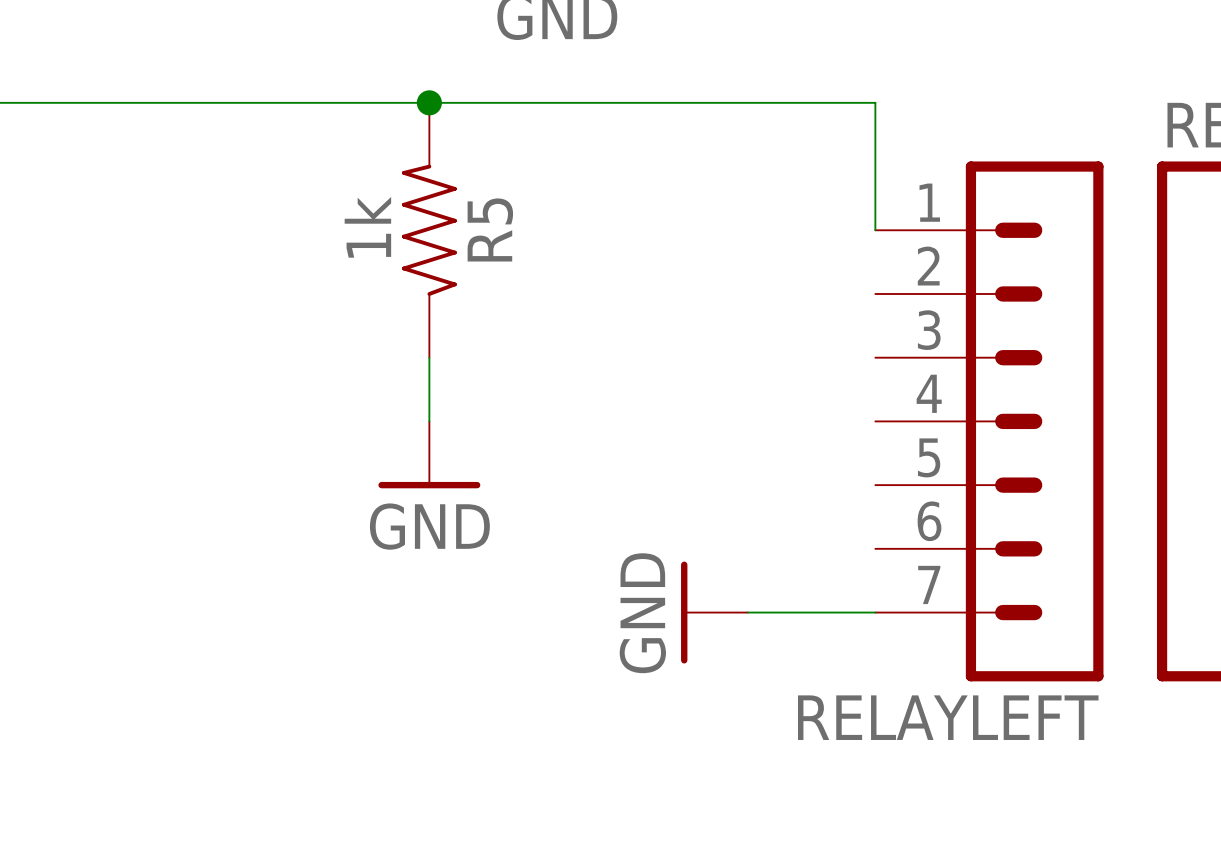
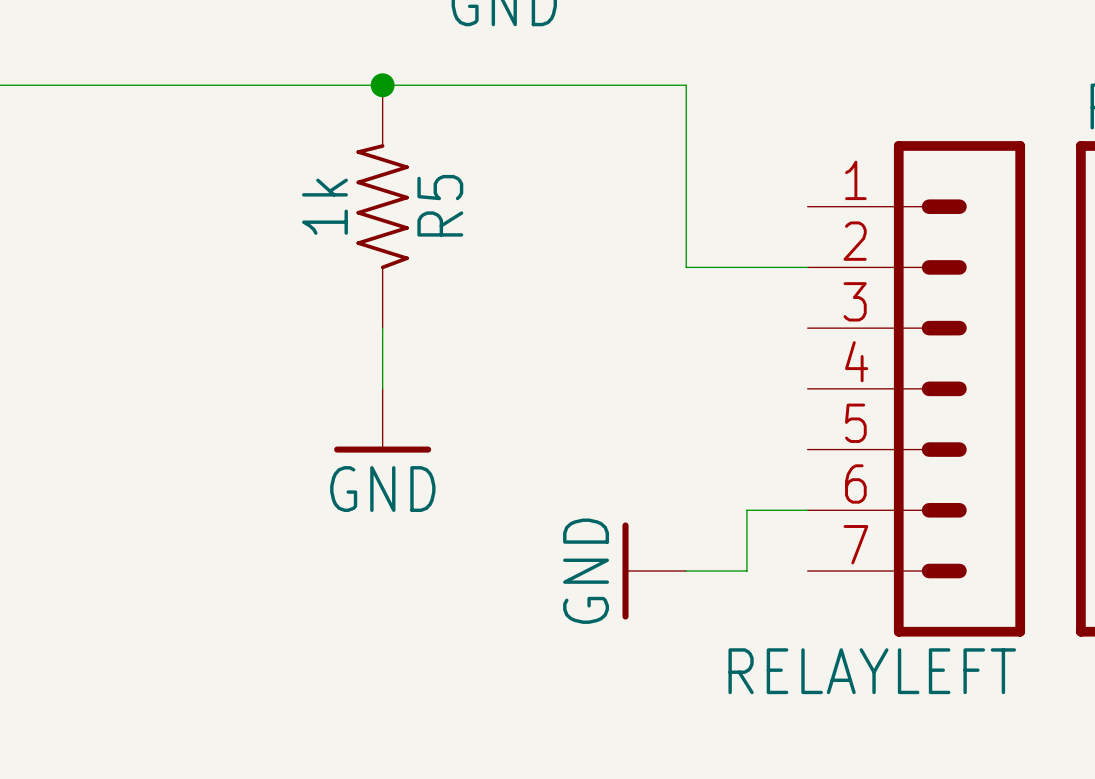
wire: (747, 102) (875, 102) (875, 230) -> (686, 85) (686, 267) (807, 267)
wire: (811, 612) (875, 612) -> (746, 571) (746, 510) (807, 510)

